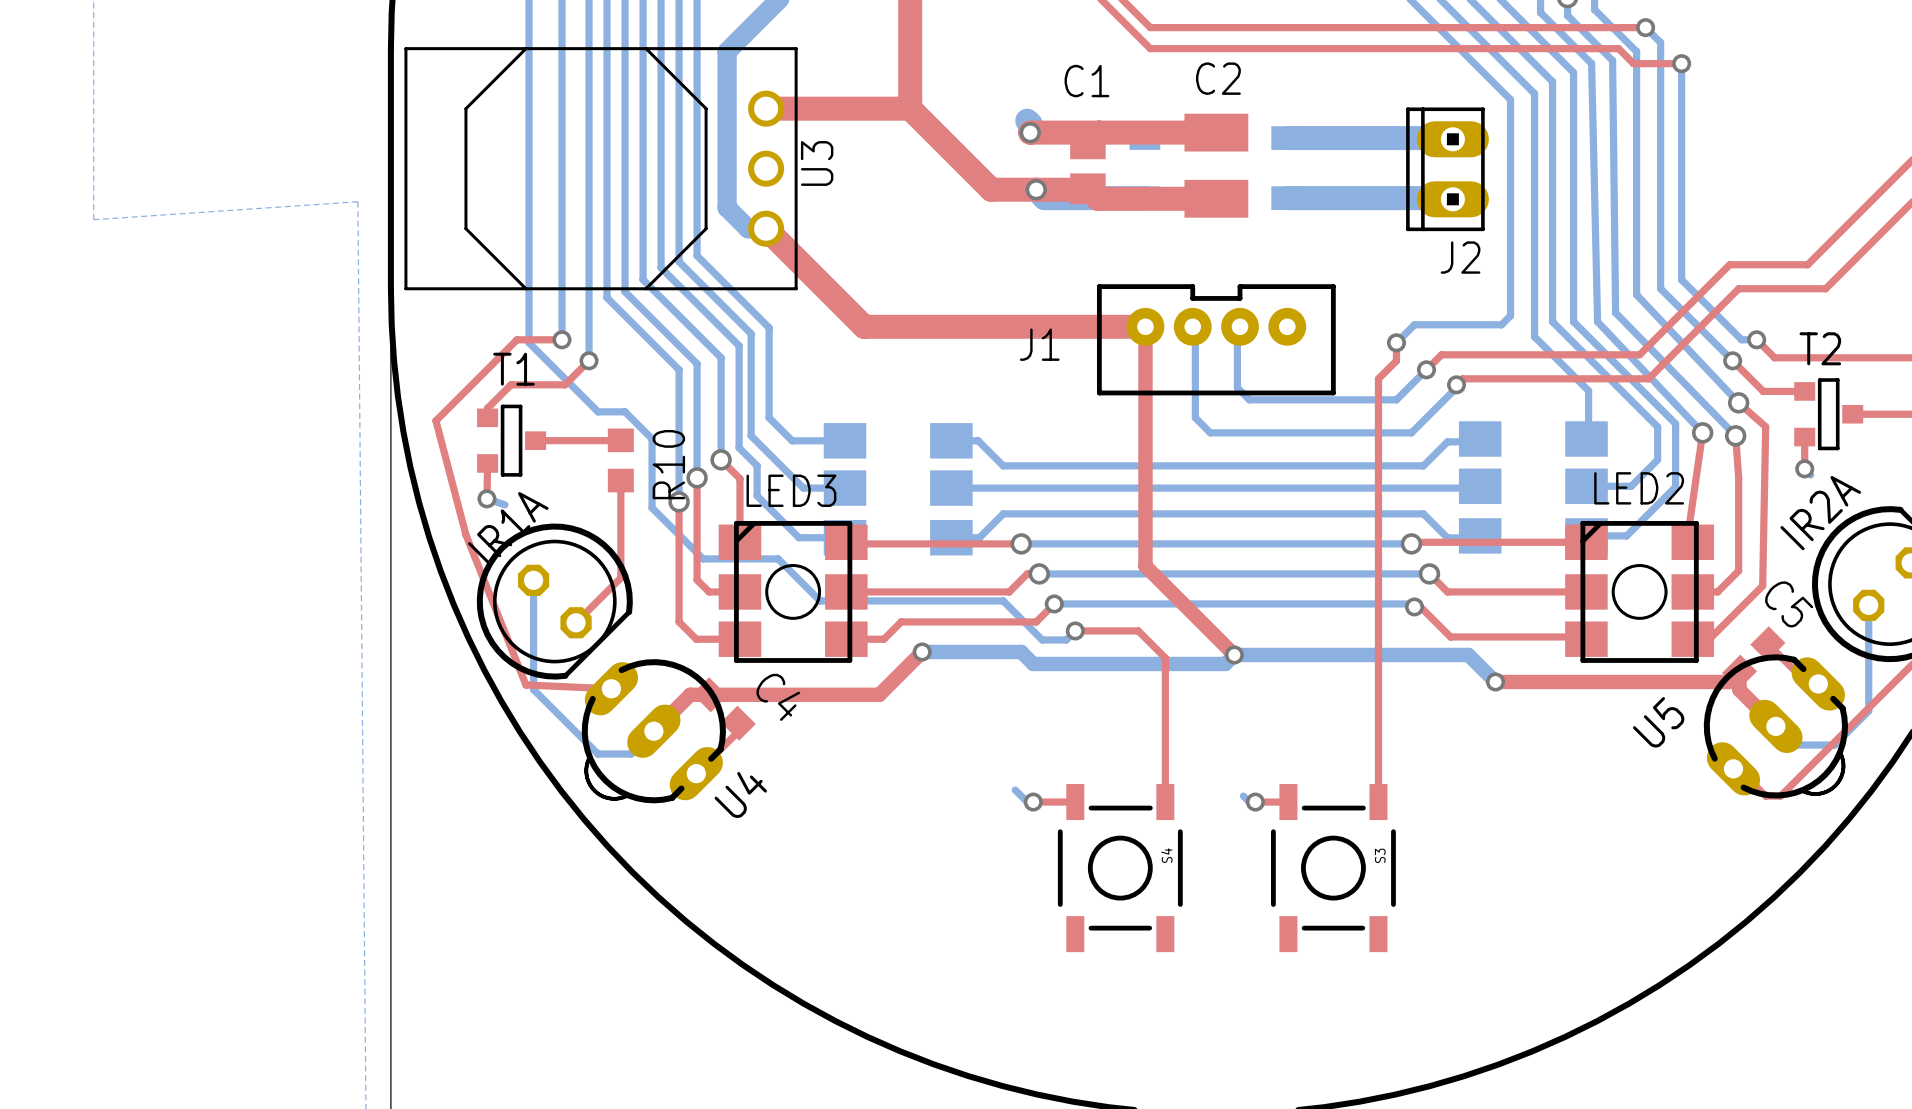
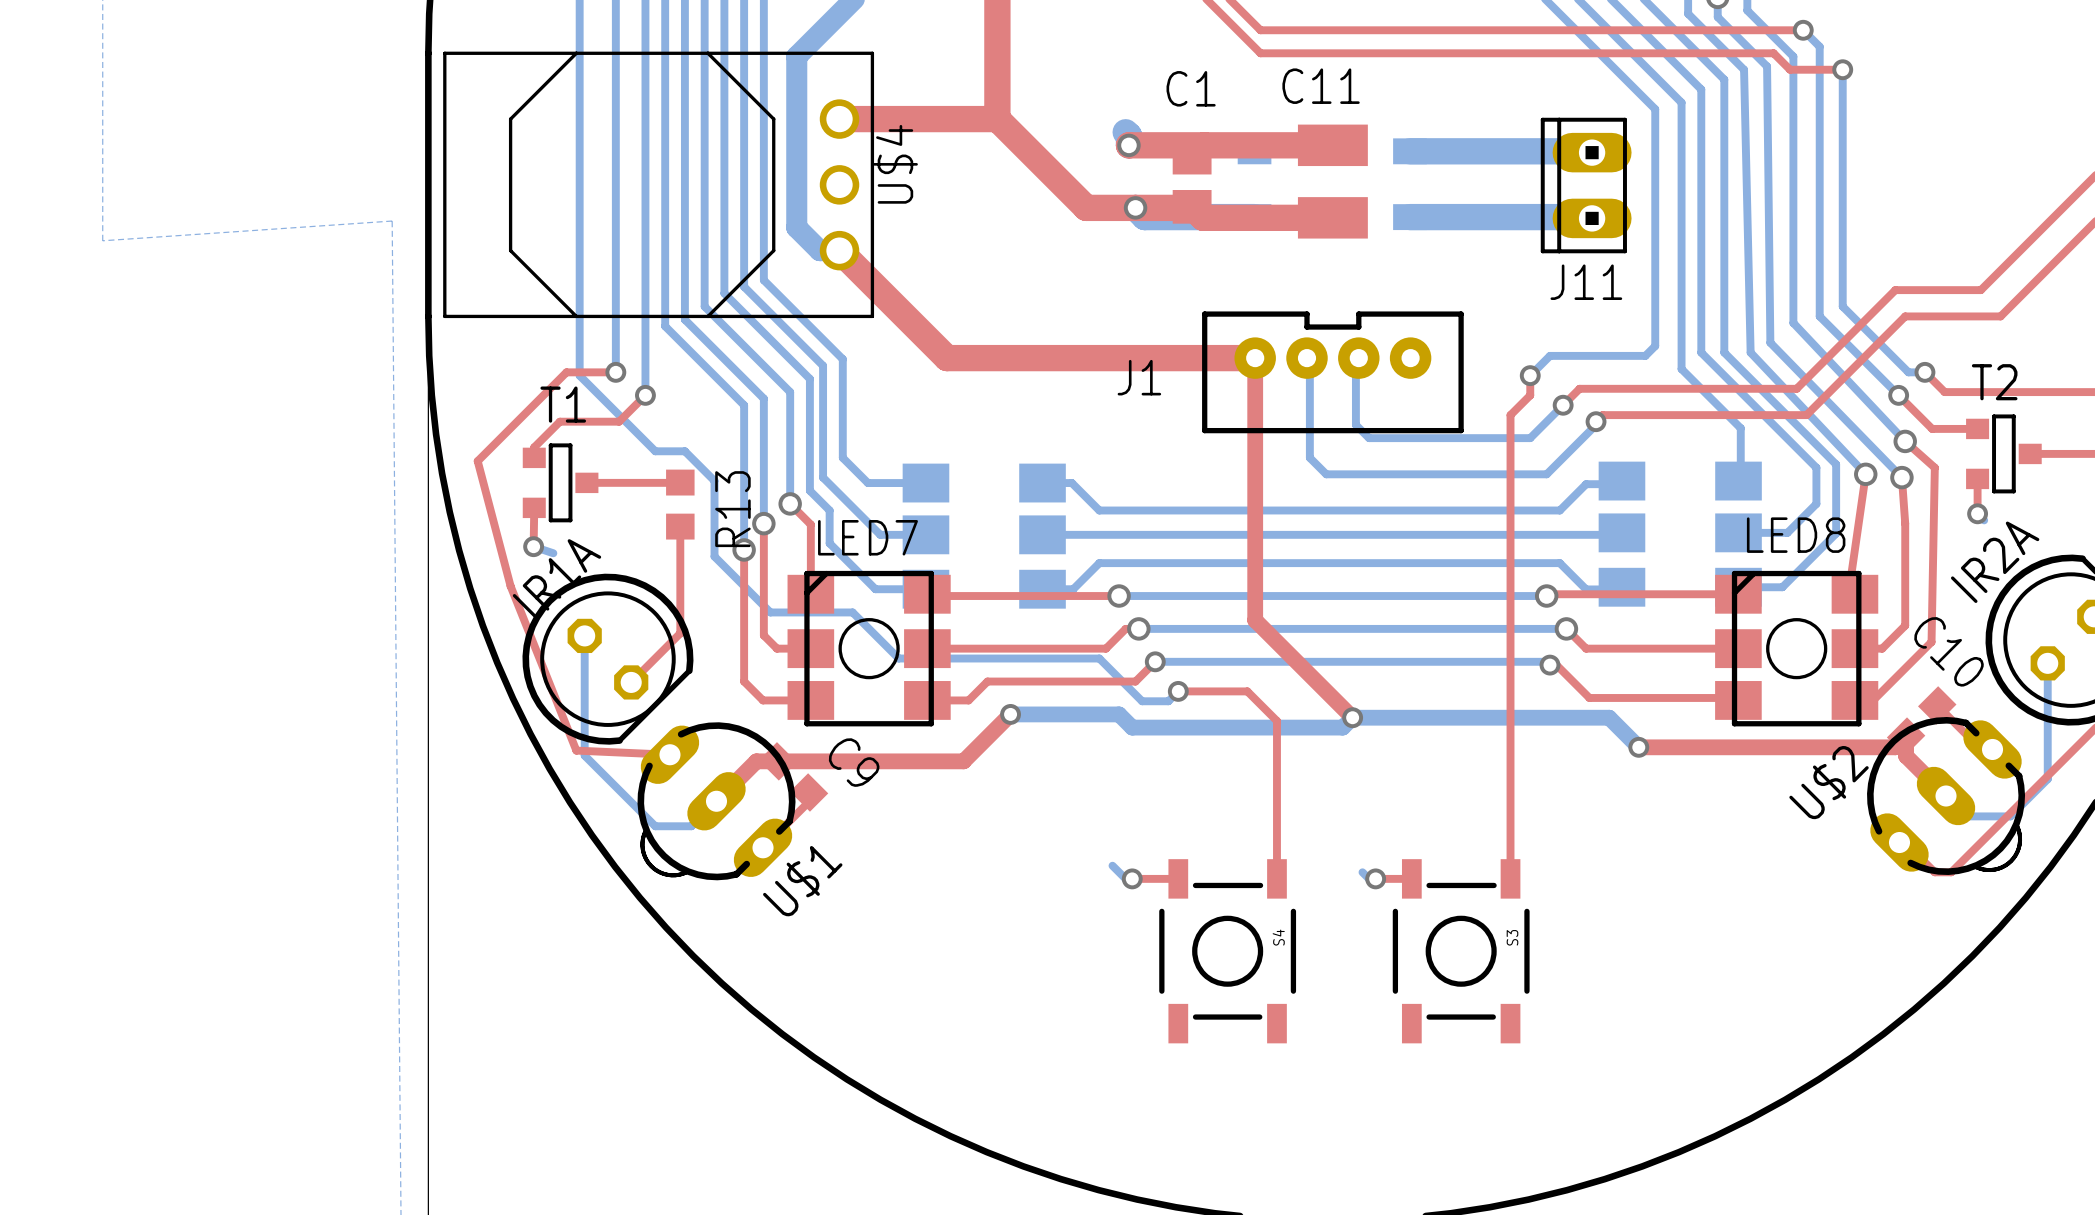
C2 name: C2 (1218, 78) -> C11 (1321, 86)
U3 name: U3 (817, 163) -> U$4 (895, 164)
J2 name: J2 (1460, 257) -> J11 (1586, 282)
R10 name: R10 (668, 464) -> R13 (732, 509)
LED2 name: LED2 (1639, 488) -> LED8 (1796, 535)
LED3 name: LED3 (791, 490) -> LED7 (867, 537)
C5 name: C5 (1789, 604) -> C10 (1949, 651)
C4 name: C4 (778, 697) -> C9 (854, 762)
U5 name: U5 (1658, 722) -> U$2 (1829, 782)
U4 name: U4 (740, 794) -> U$1 (802, 881)

